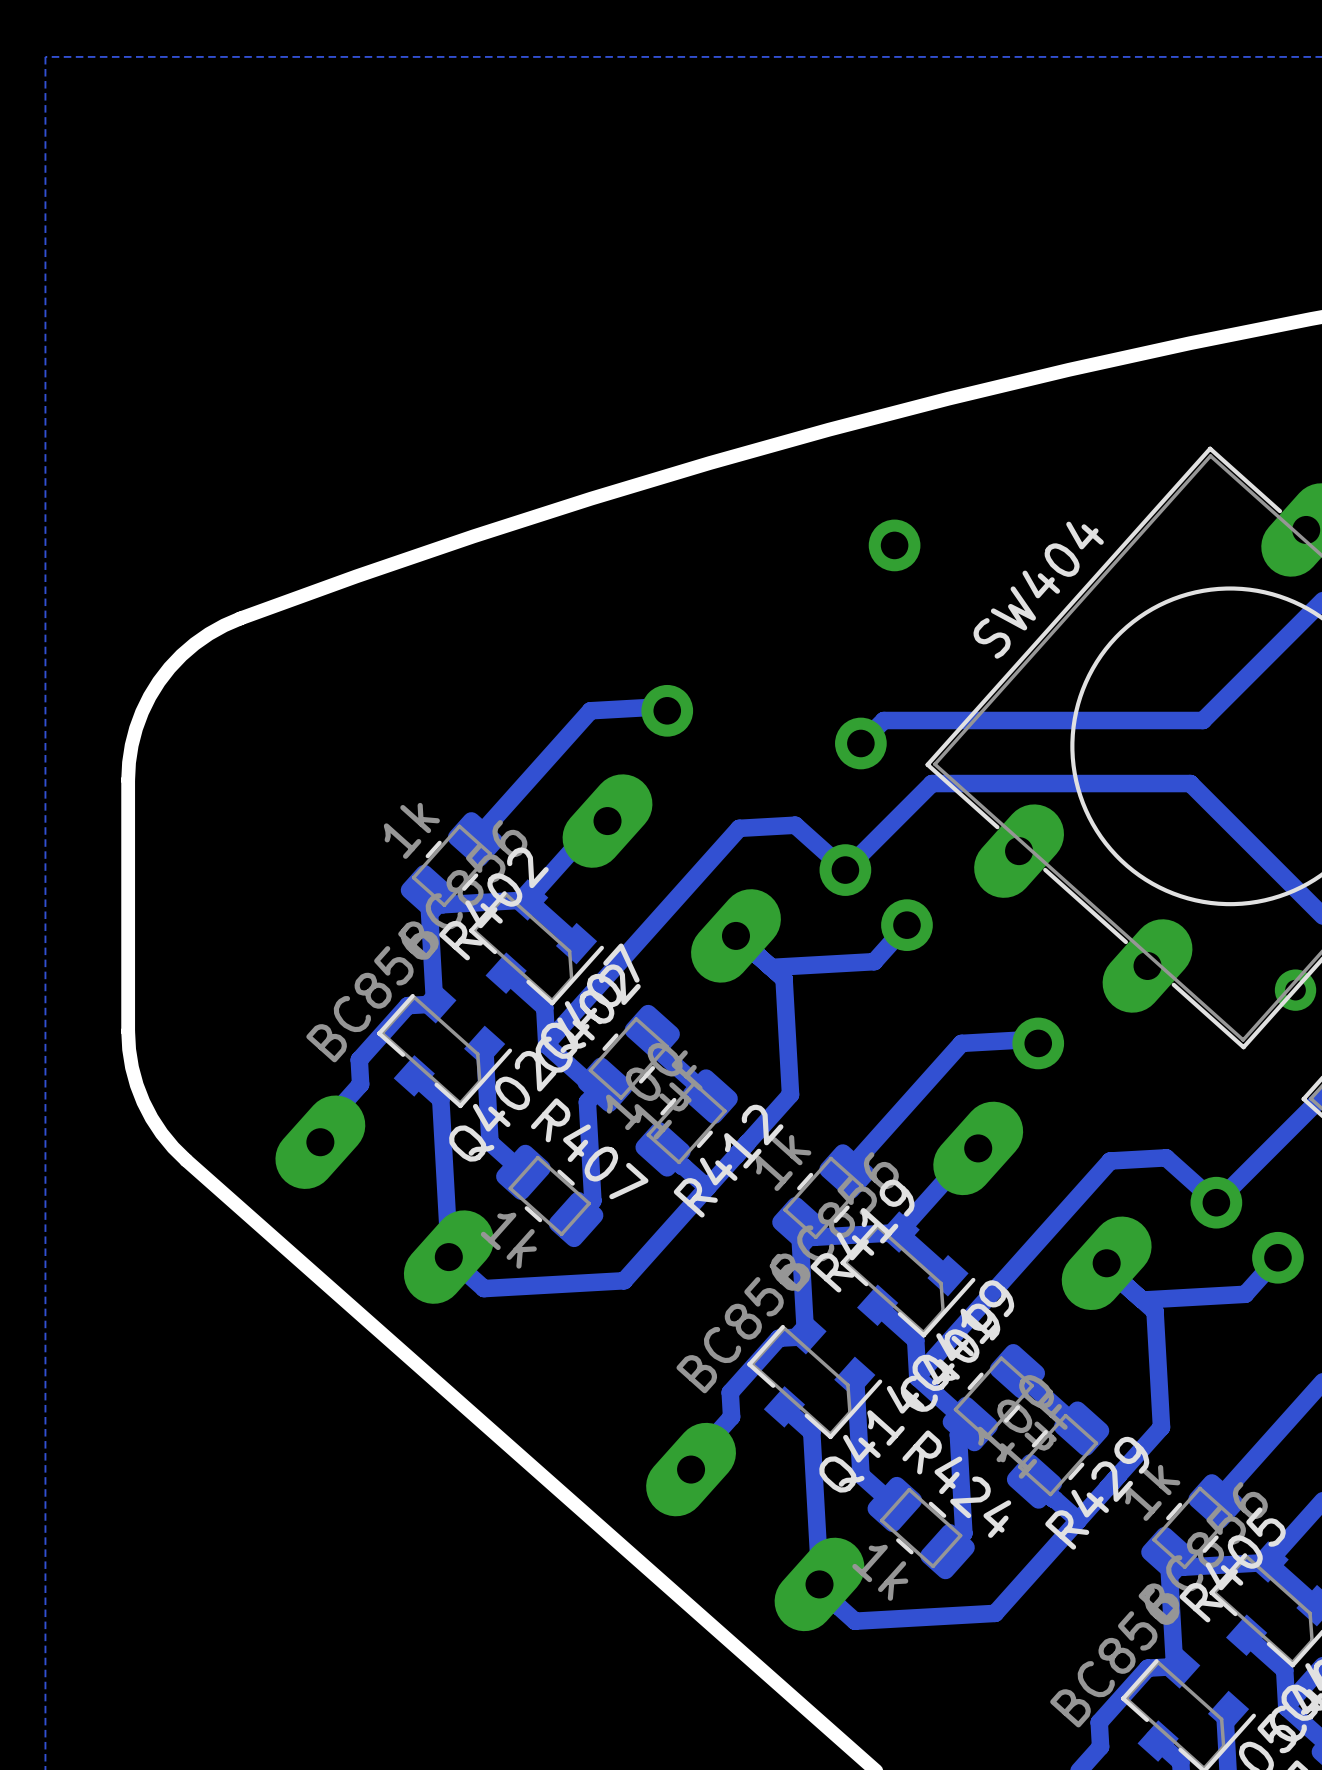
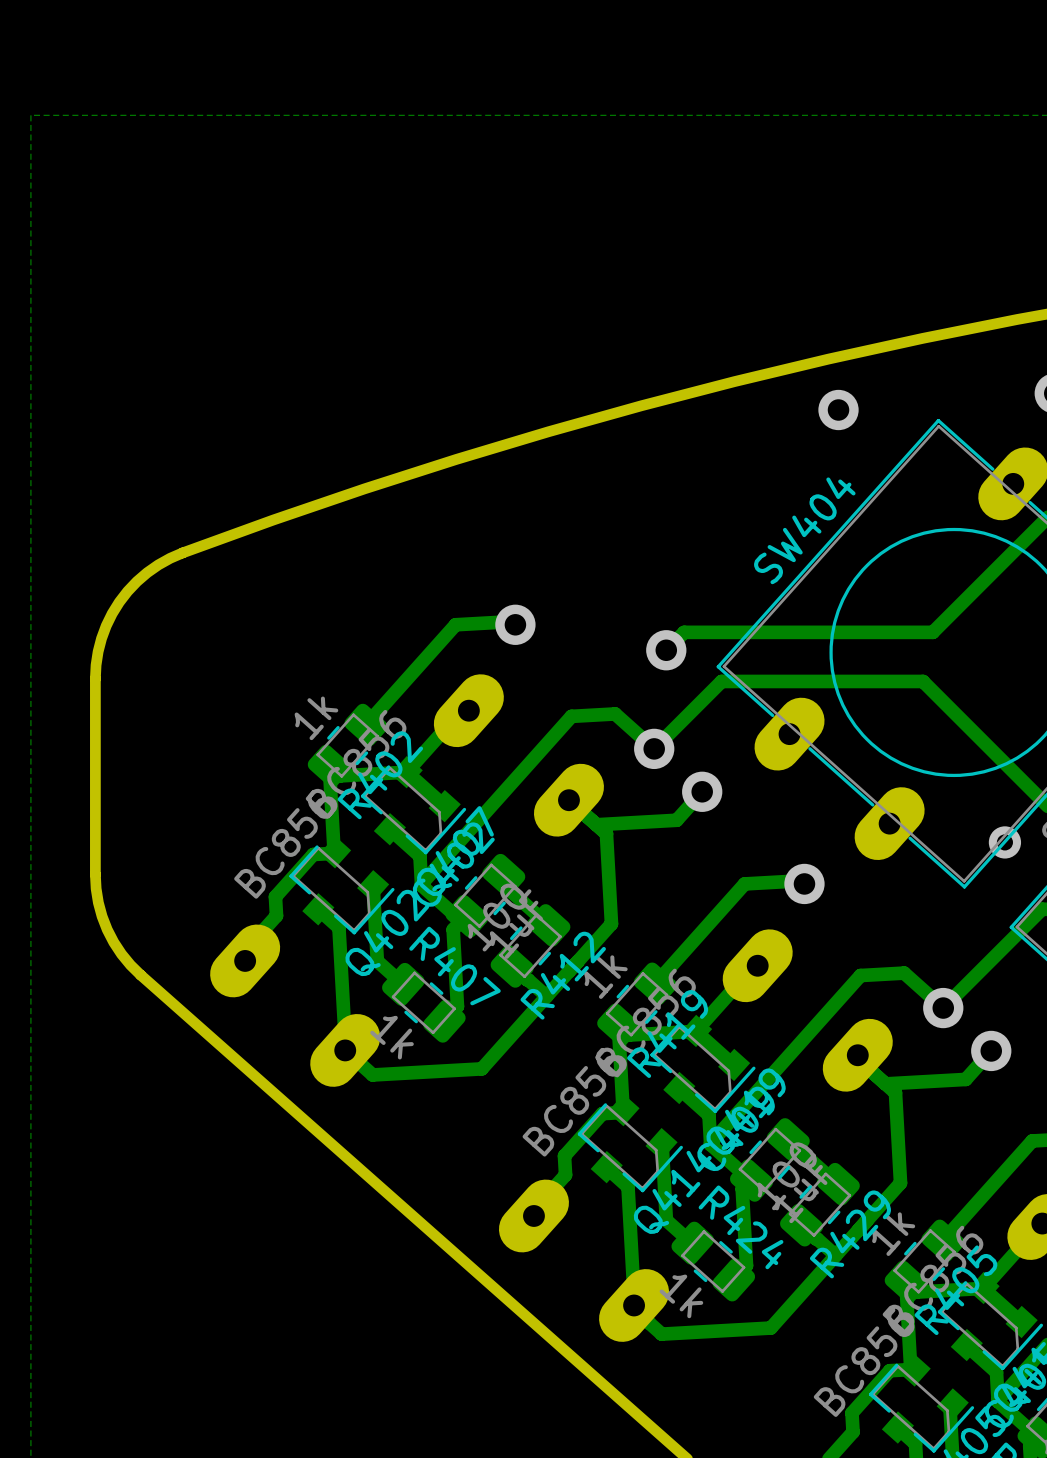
via: none -> (838, 410)
via: (894, 545) -> none

